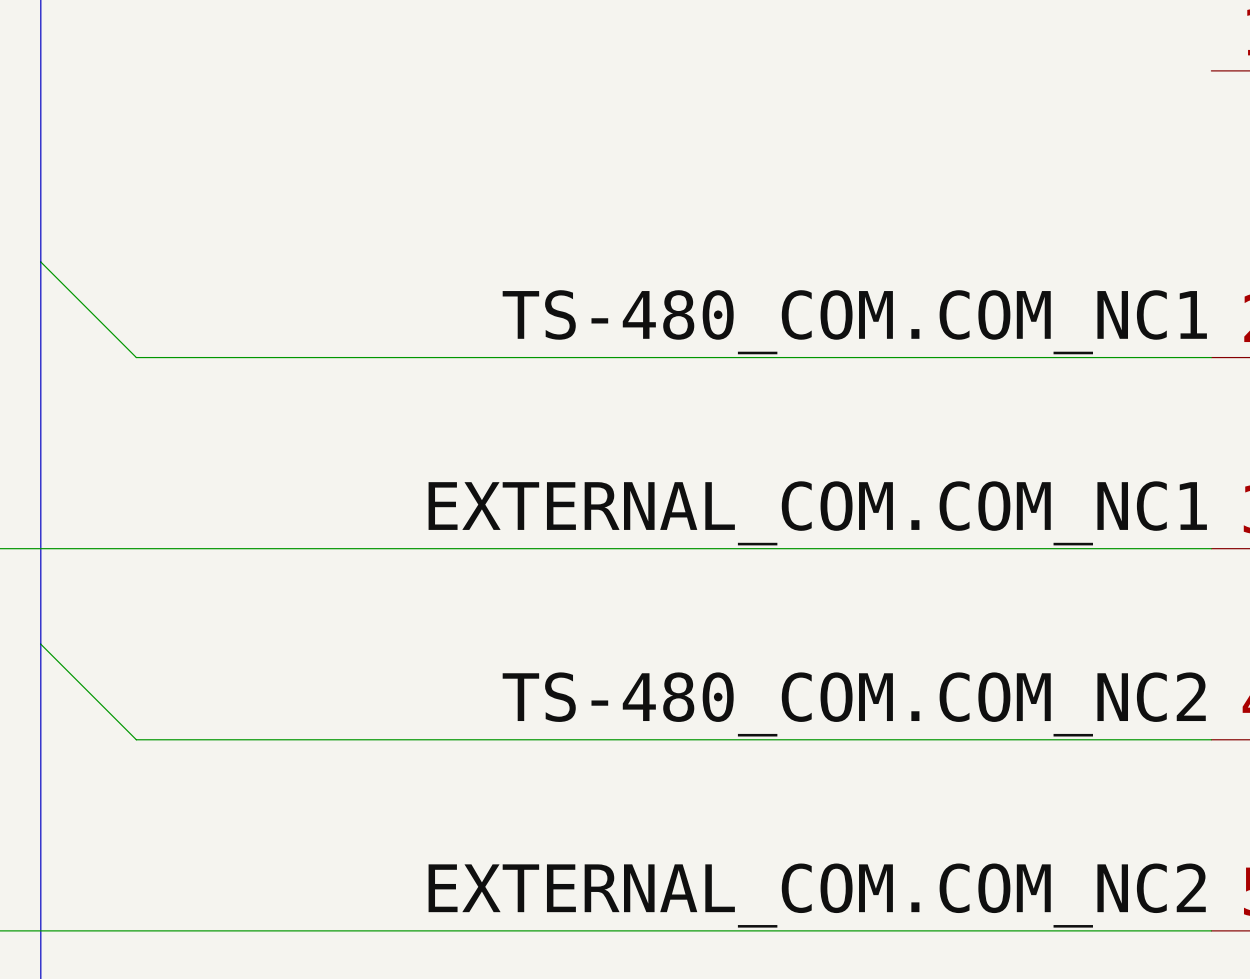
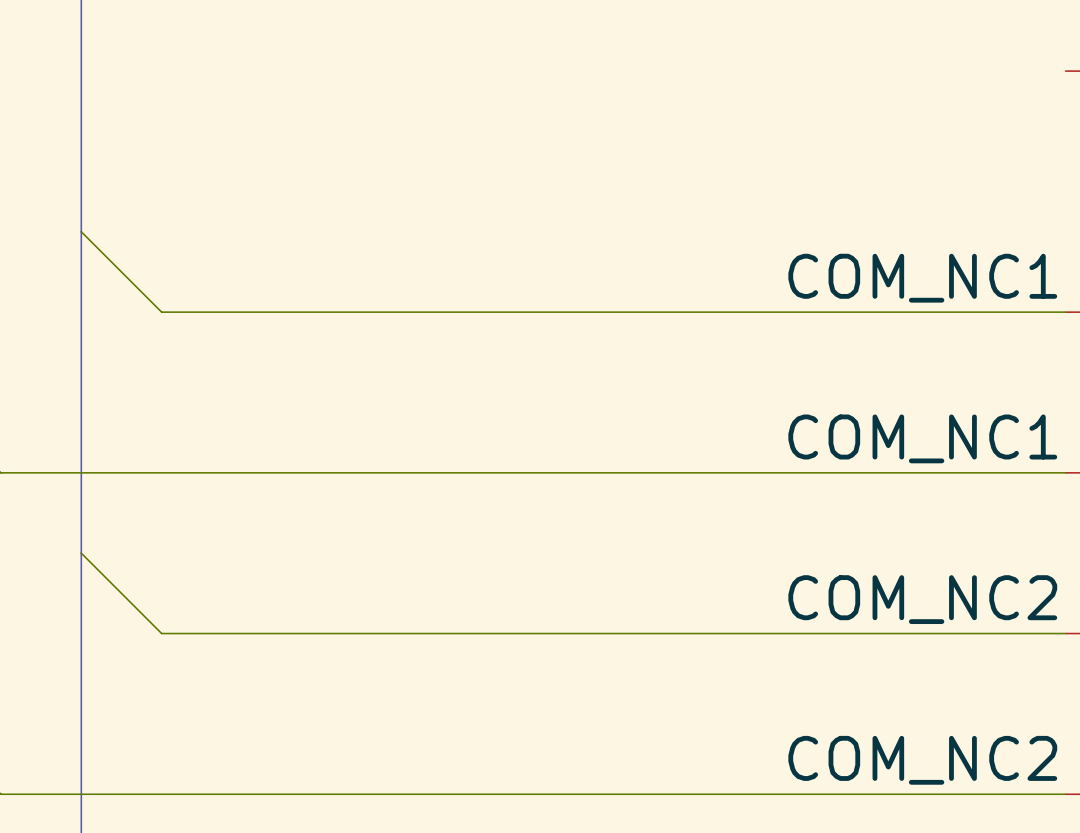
label: TS-480_COM.COM_NC1 (854, 322) -> COM_NC1 (922, 278)
label: EXTERNAL_COM.COM_NC1 (817, 513) -> COM_NC1 (922, 438)
label: TS-480_COM.COM_NC2 (854, 704) -> COM_NC2 (922, 599)
label: EXTERNAL_COM.COM_NC2 (817, 895) -> COM_NC2 (922, 760)

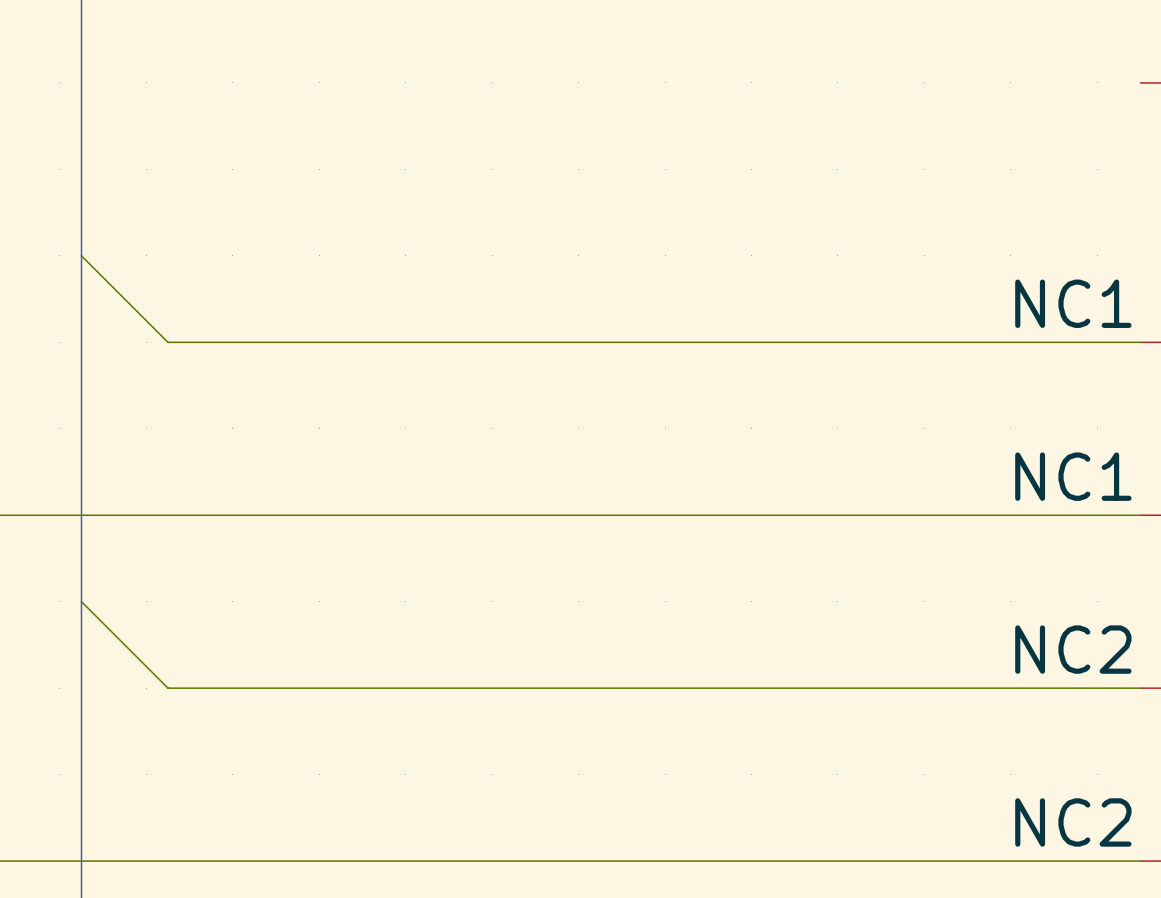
label: COM_NC1 (922, 278) -> NC1 (1073, 303)
label: COM_NC1 (922, 438) -> NC1 (1073, 476)
label: COM_NC2 (922, 599) -> NC2 (1073, 649)
label: COM_NC2 (922, 760) -> NC2 (1073, 822)

